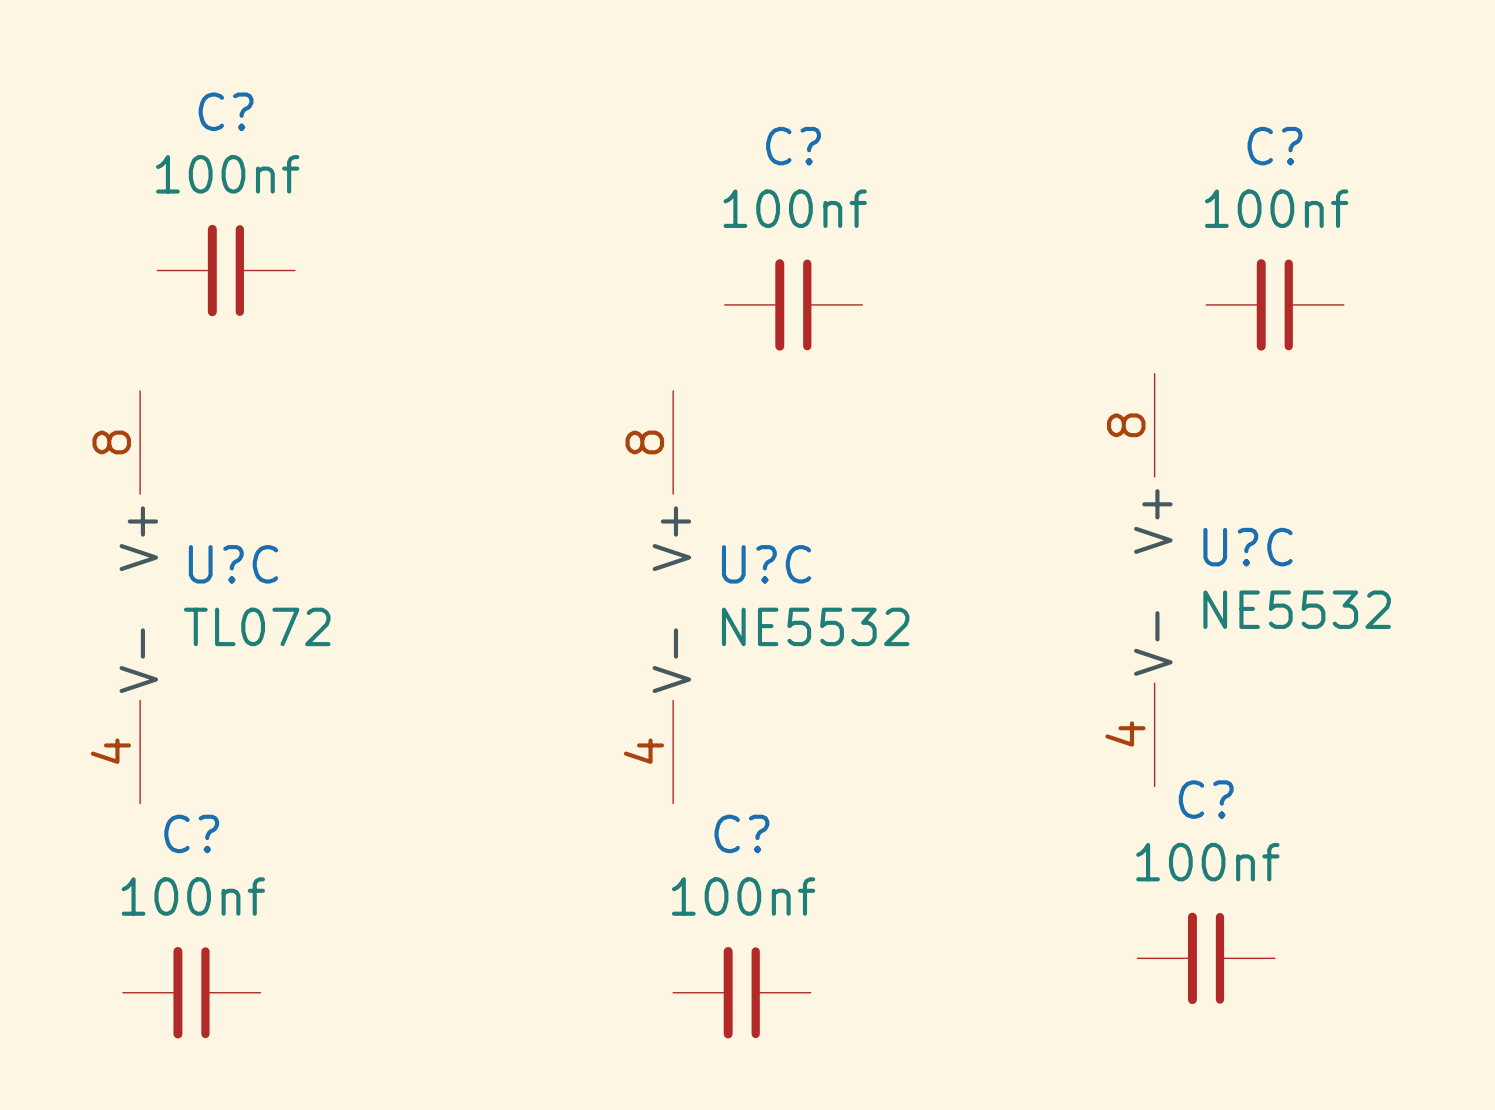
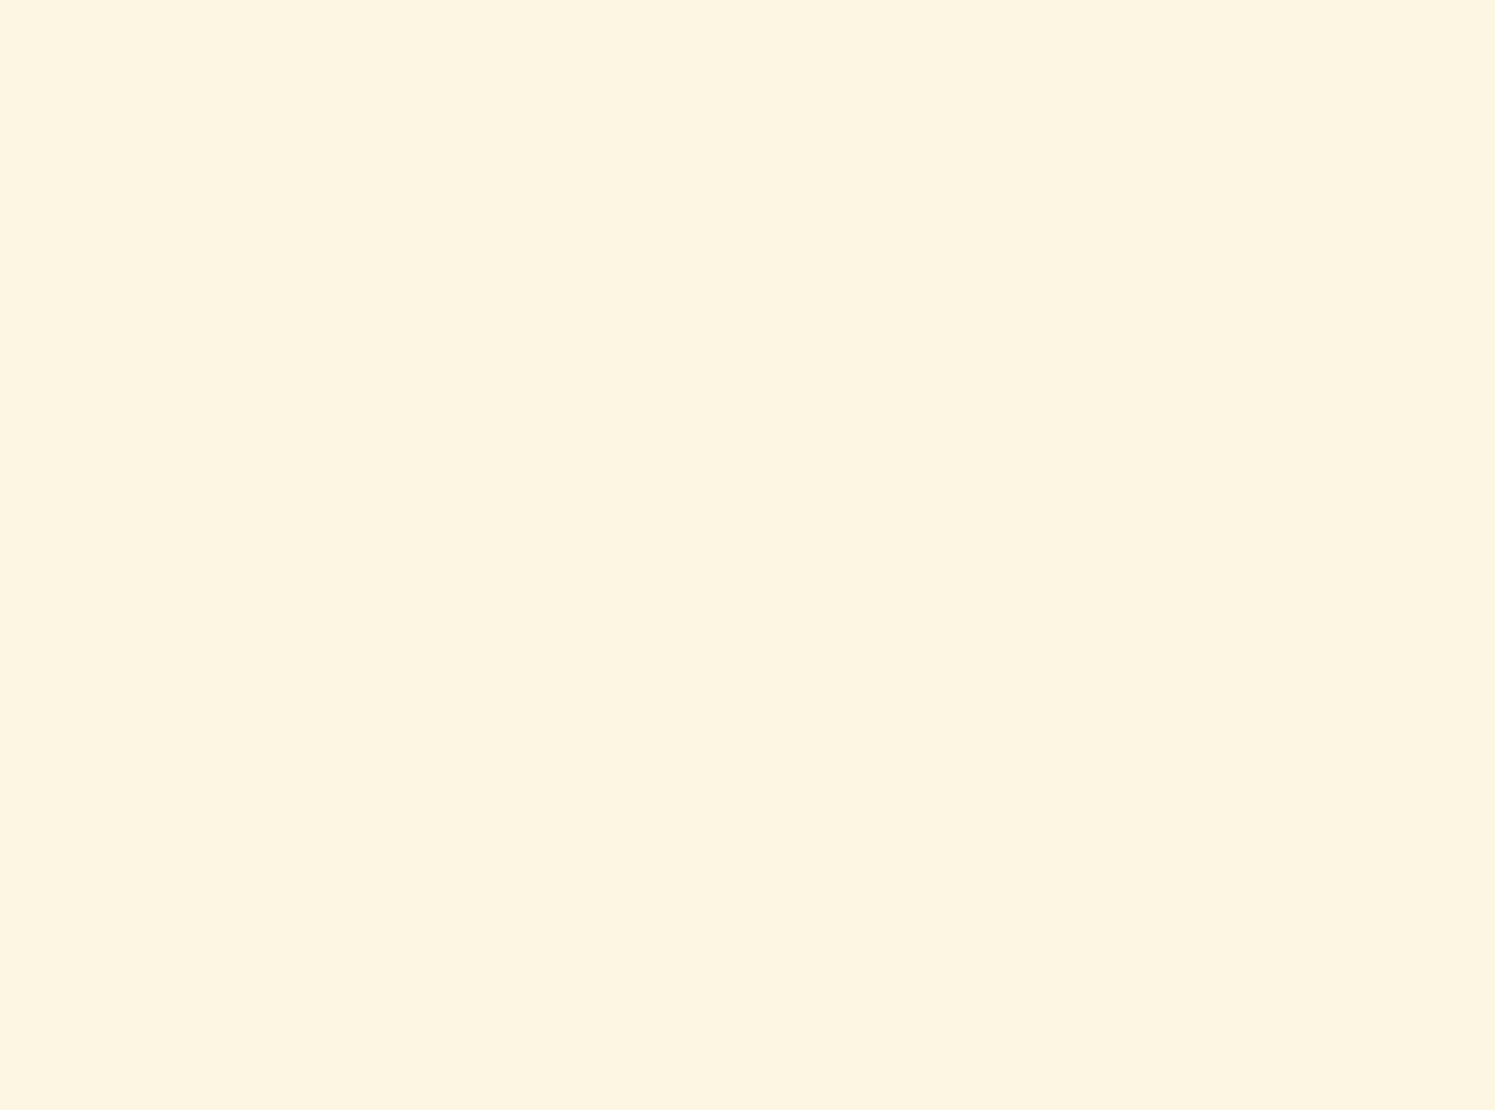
C?: 100nf (226, 270) -> none
C?: 100nf (793, 304) -> none
C?: 100nf (1274, 304) -> none
U?C: NE5532 (1154, 580) -> none
U?C: TL072 (140, 597) -> none
U?C: NE5532 (673, 597) -> none
C?: 100nf (1206, 958) -> none
C?: 100nf (191, 992) -> none
C?: 100nf (741, 992) -> none

